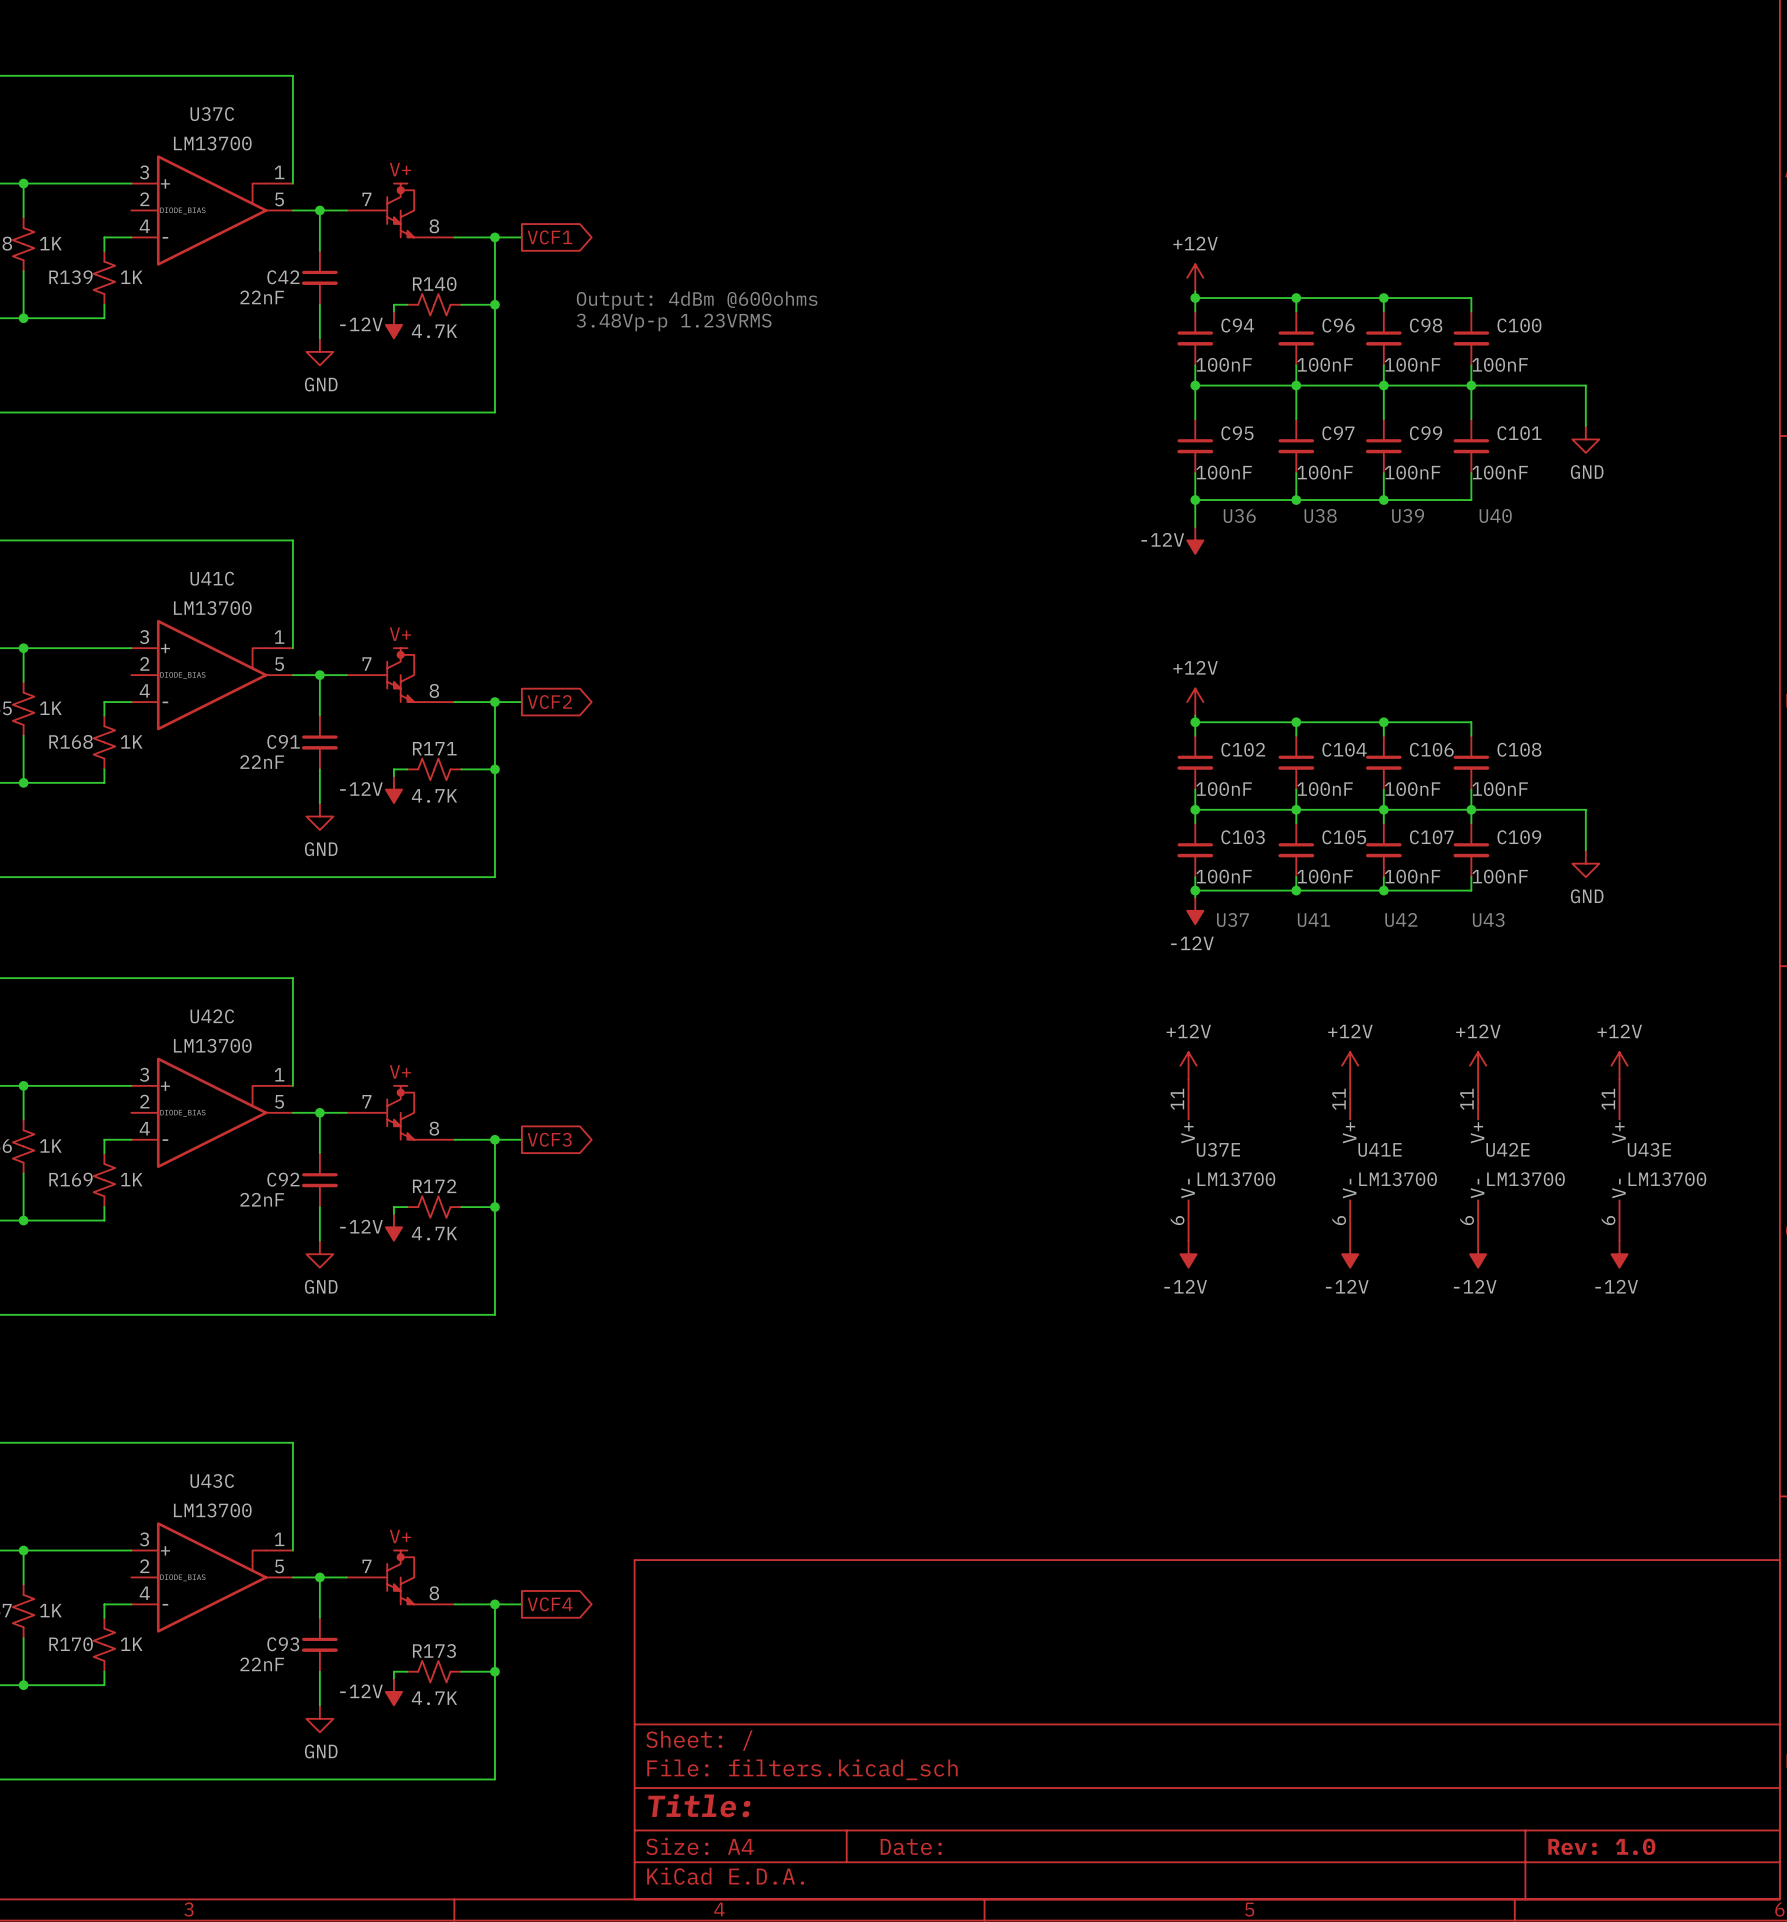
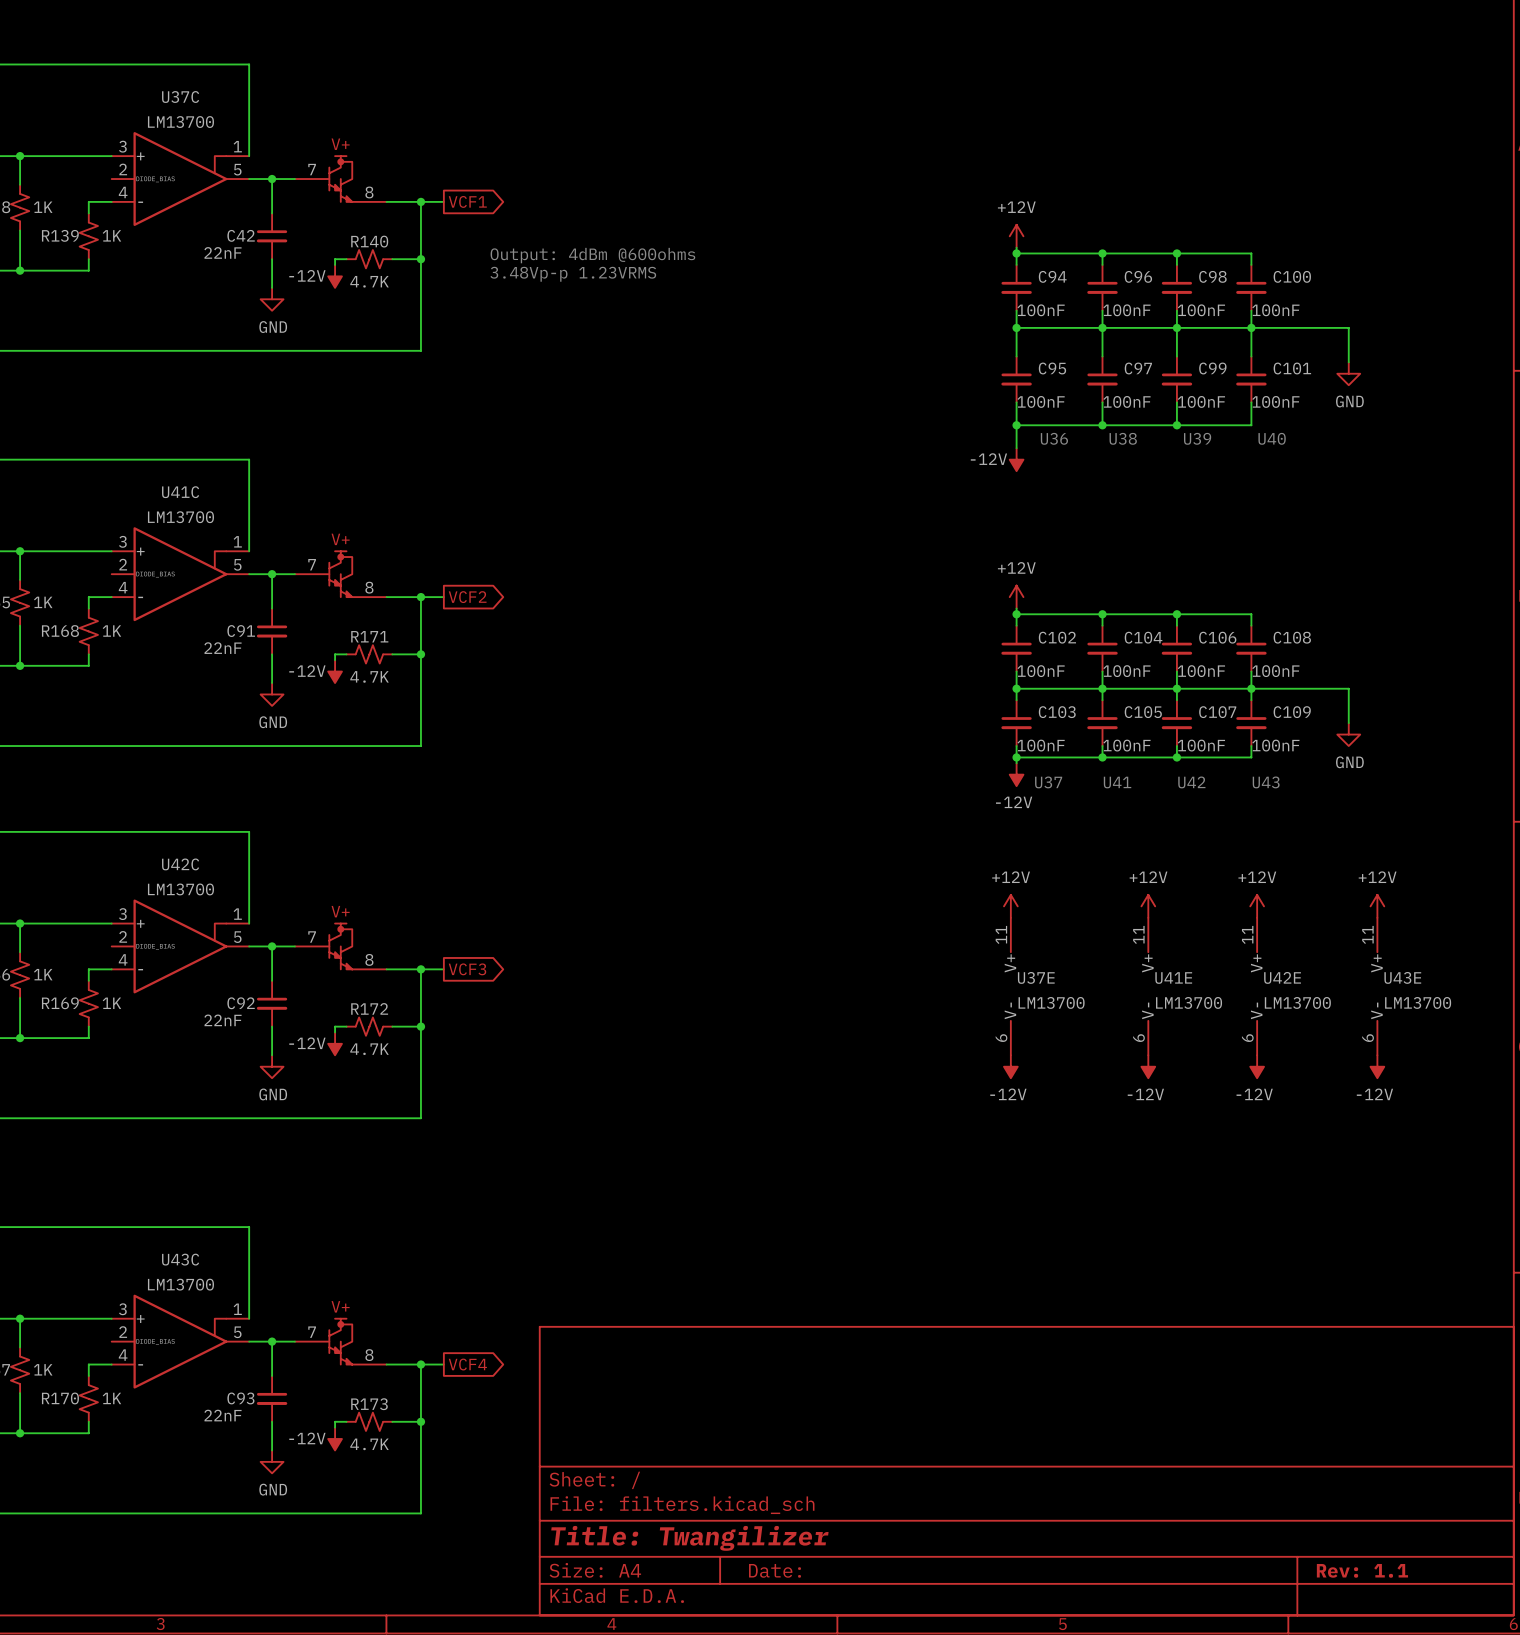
title block: Title: (699, 1805) -> Title: Twangilizer (689, 1538)
title block: Rev: 1.0 (1601, 1846) -> Rev: 1.1 (1362, 1570)

